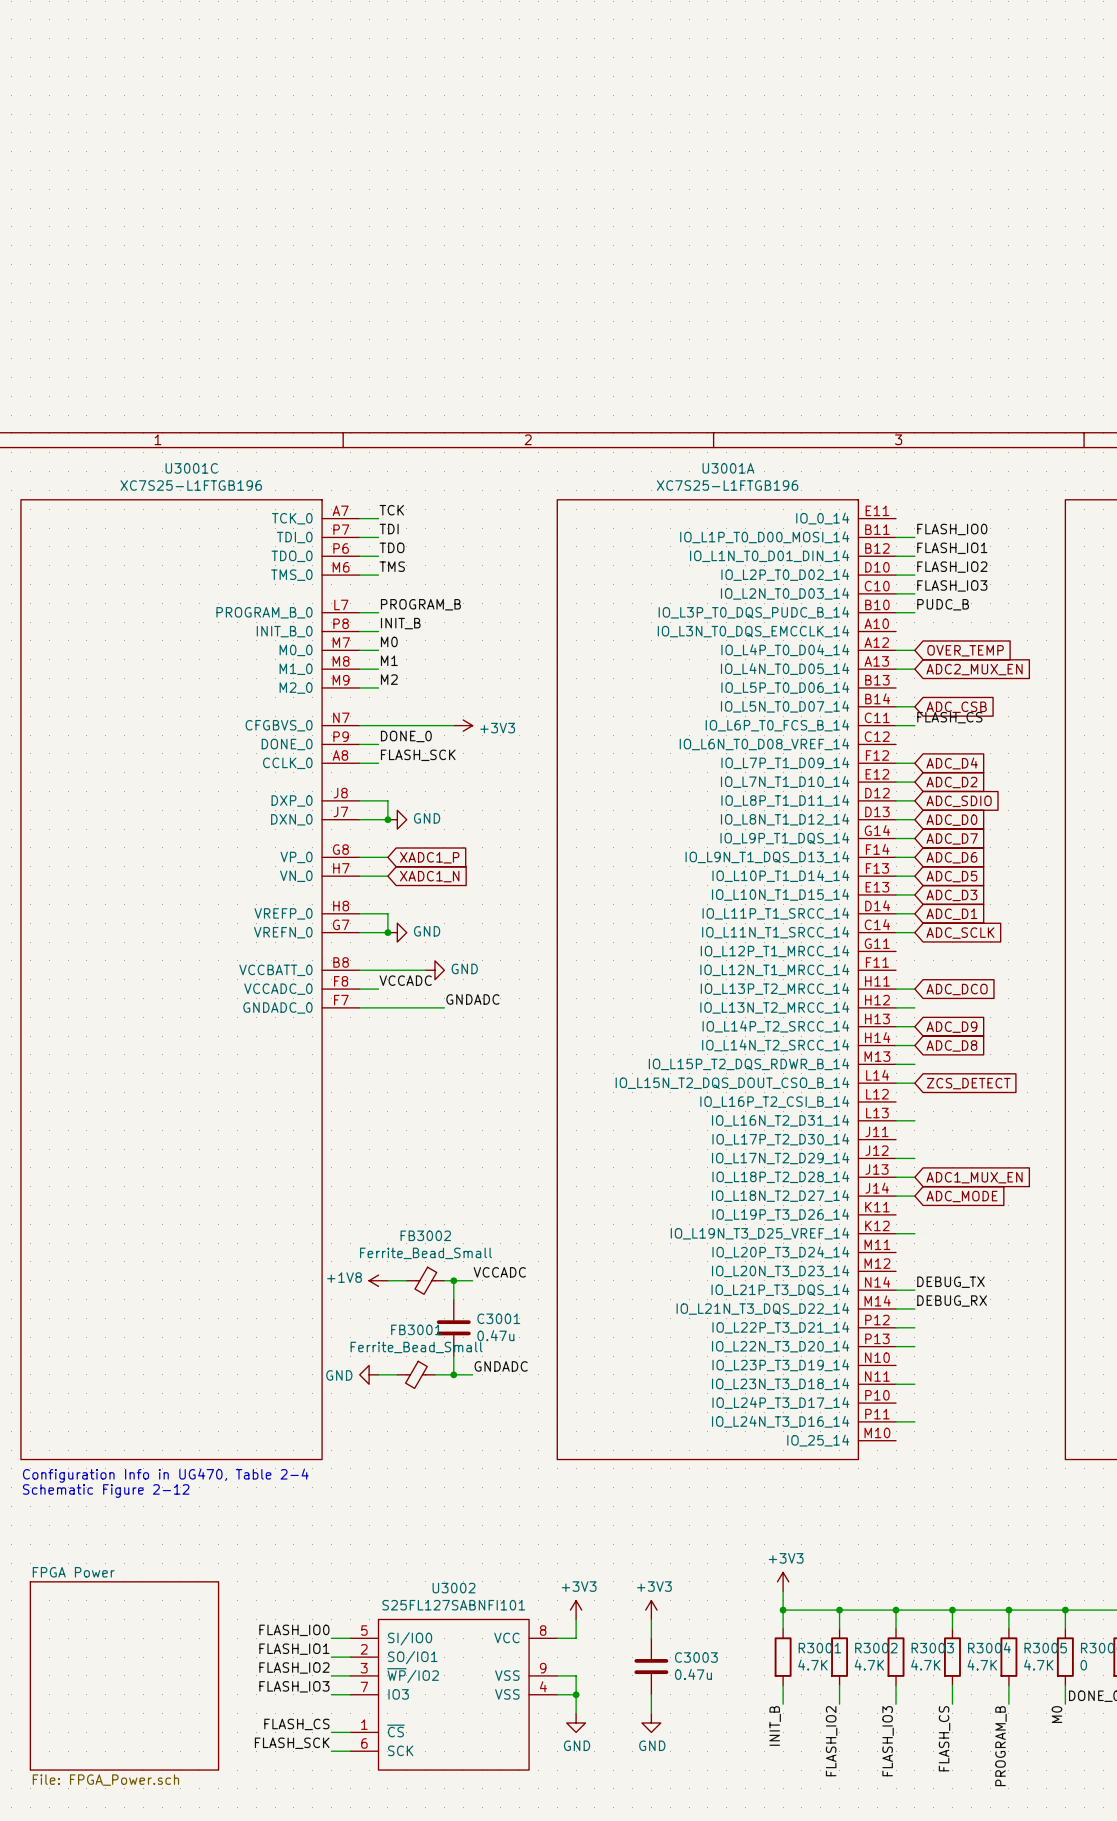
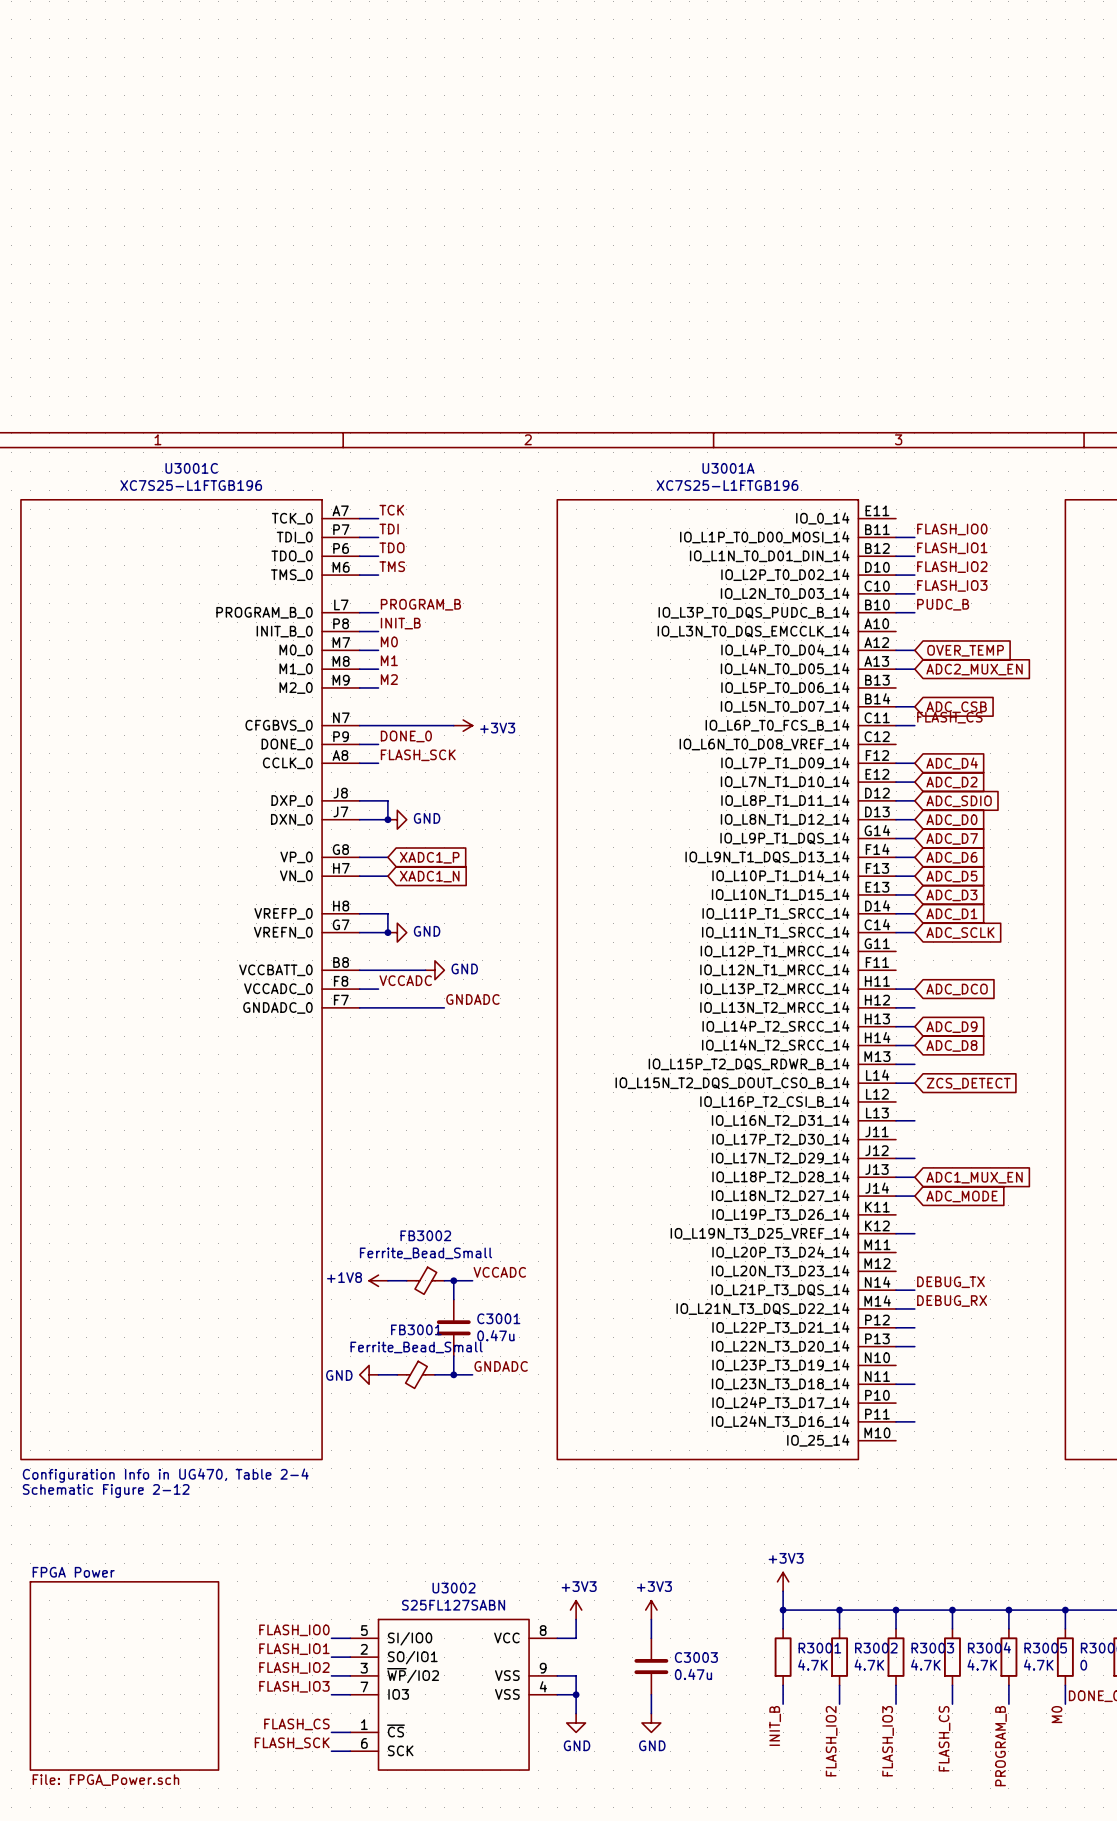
U3002 value: S25FL127SABNFI101 (453, 1605) -> S25FL127SABN (453, 1605)

